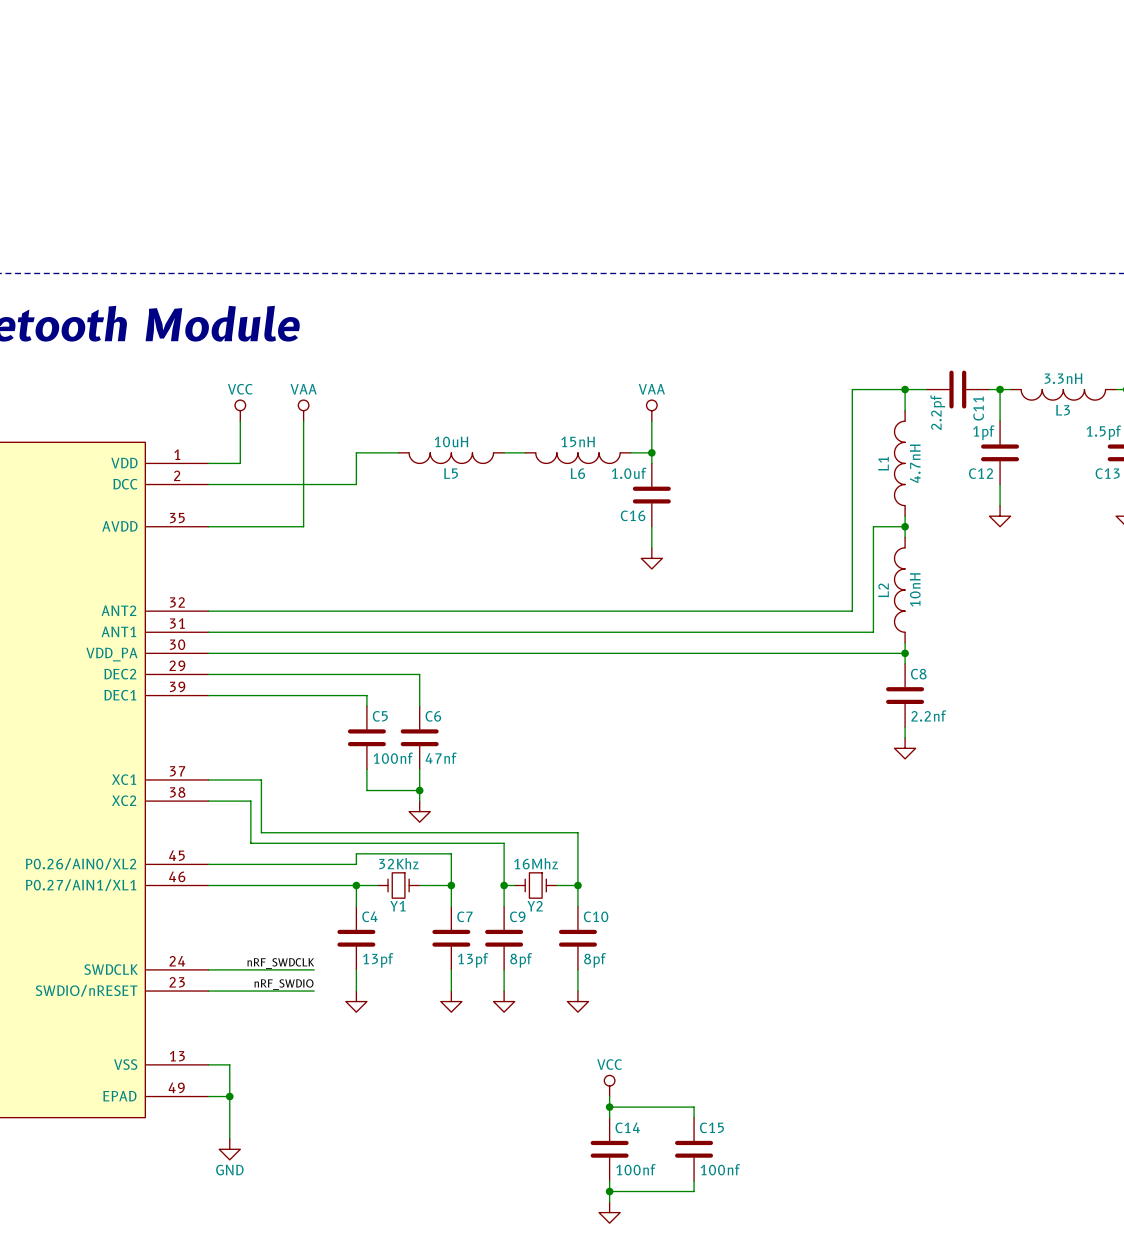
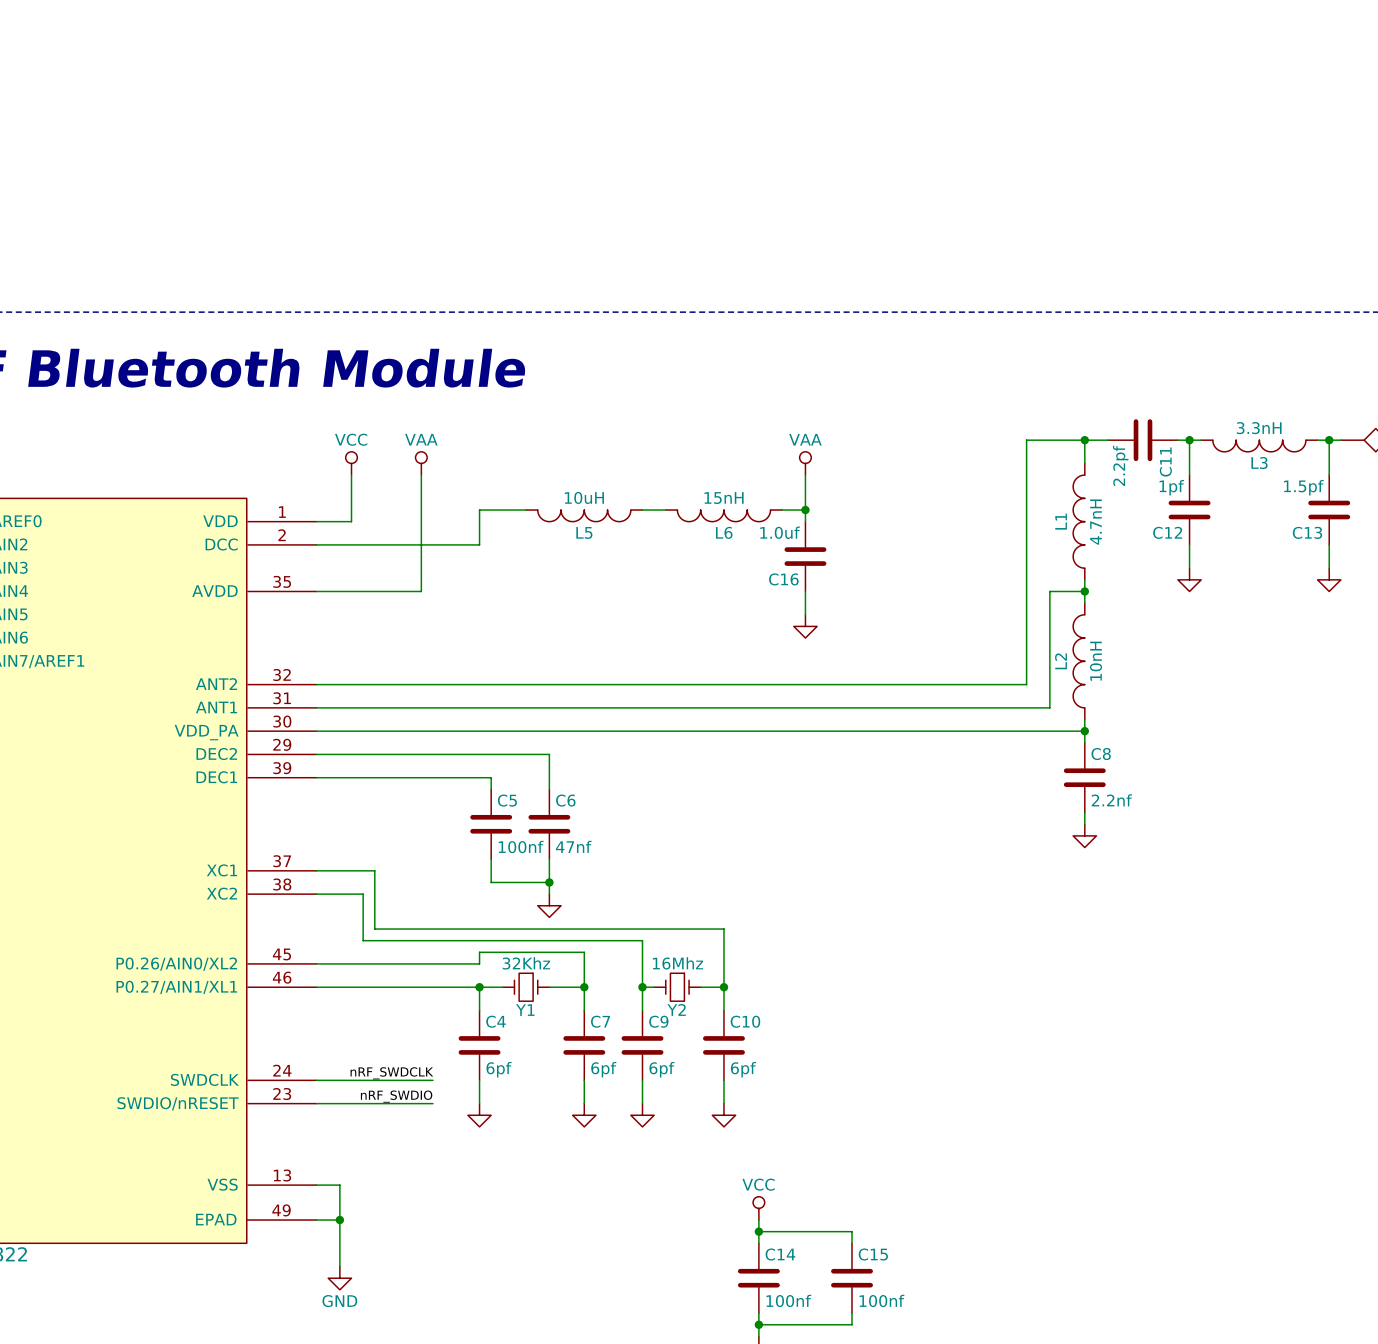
C4 value: 13pf (378, 960) -> 6pf (499, 1069)
C7 value: 13pf (473, 960) -> 6pf (603, 1069)
C9 value: 8pf (521, 960) -> 6pf (661, 1069)
C10 value: 8pf (595, 960) -> 6pf (743, 1069)

